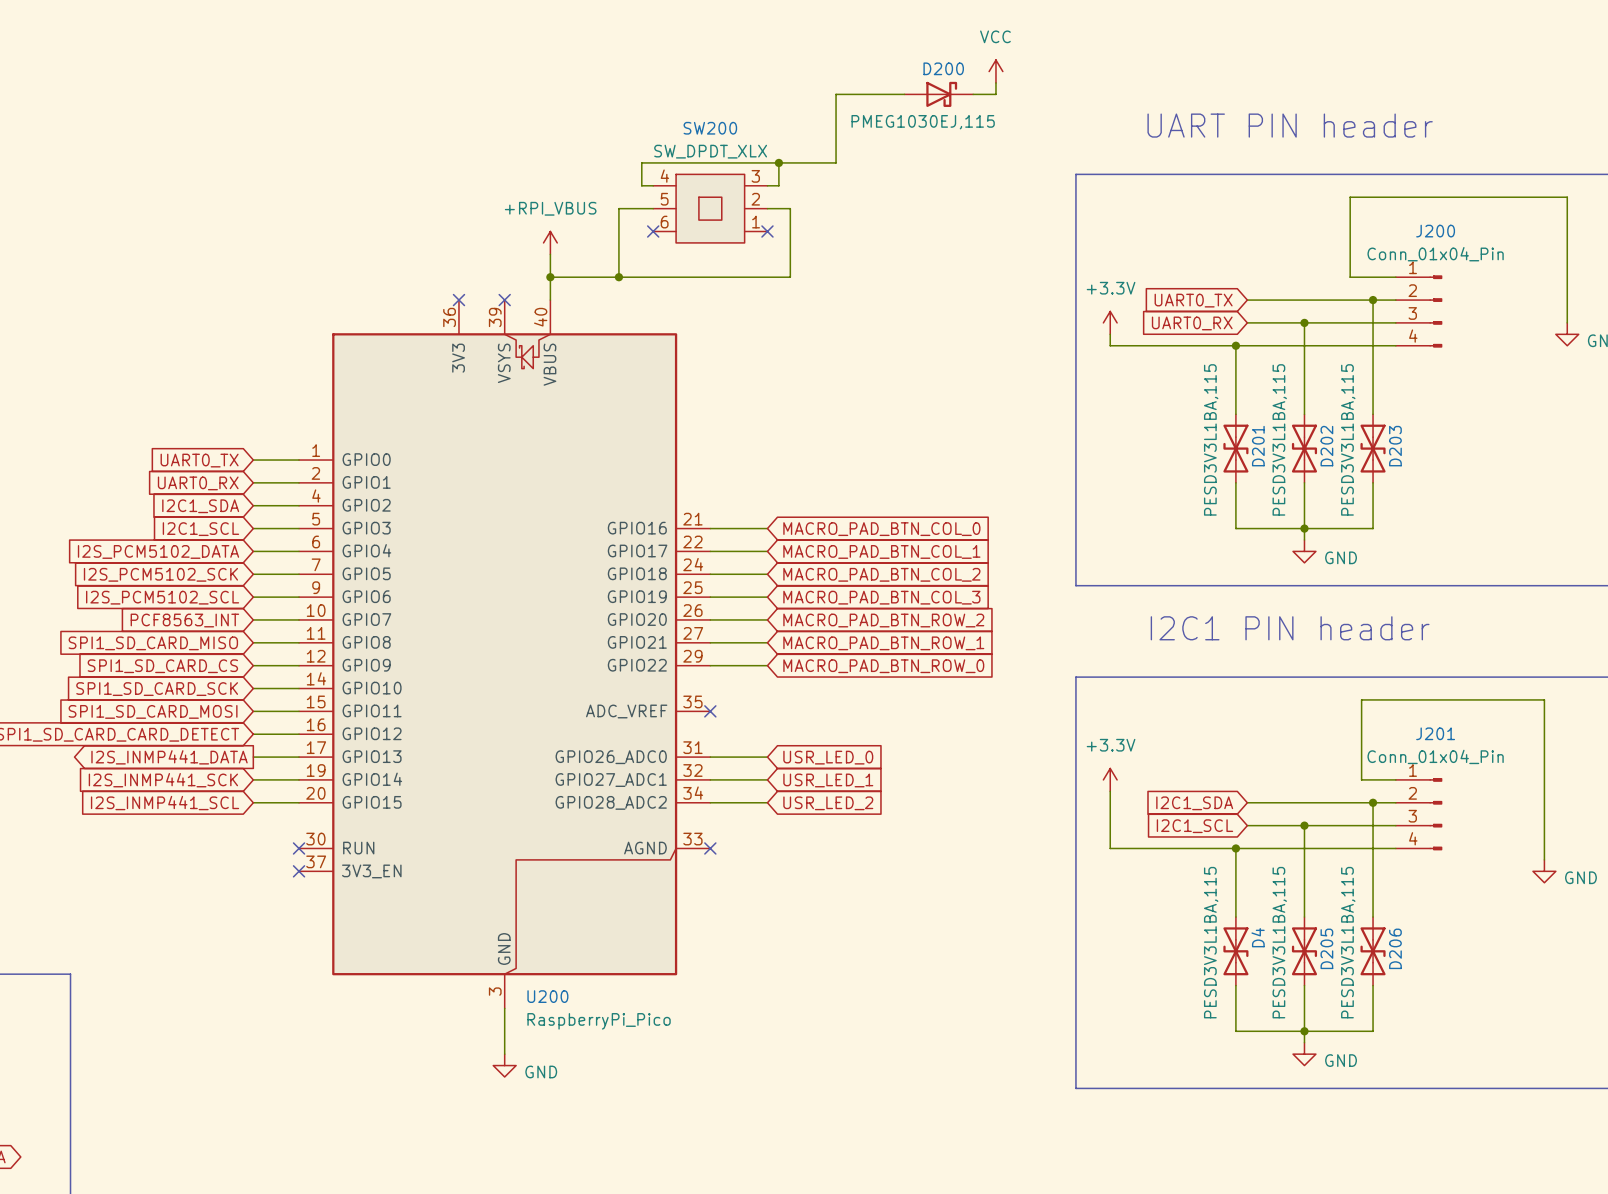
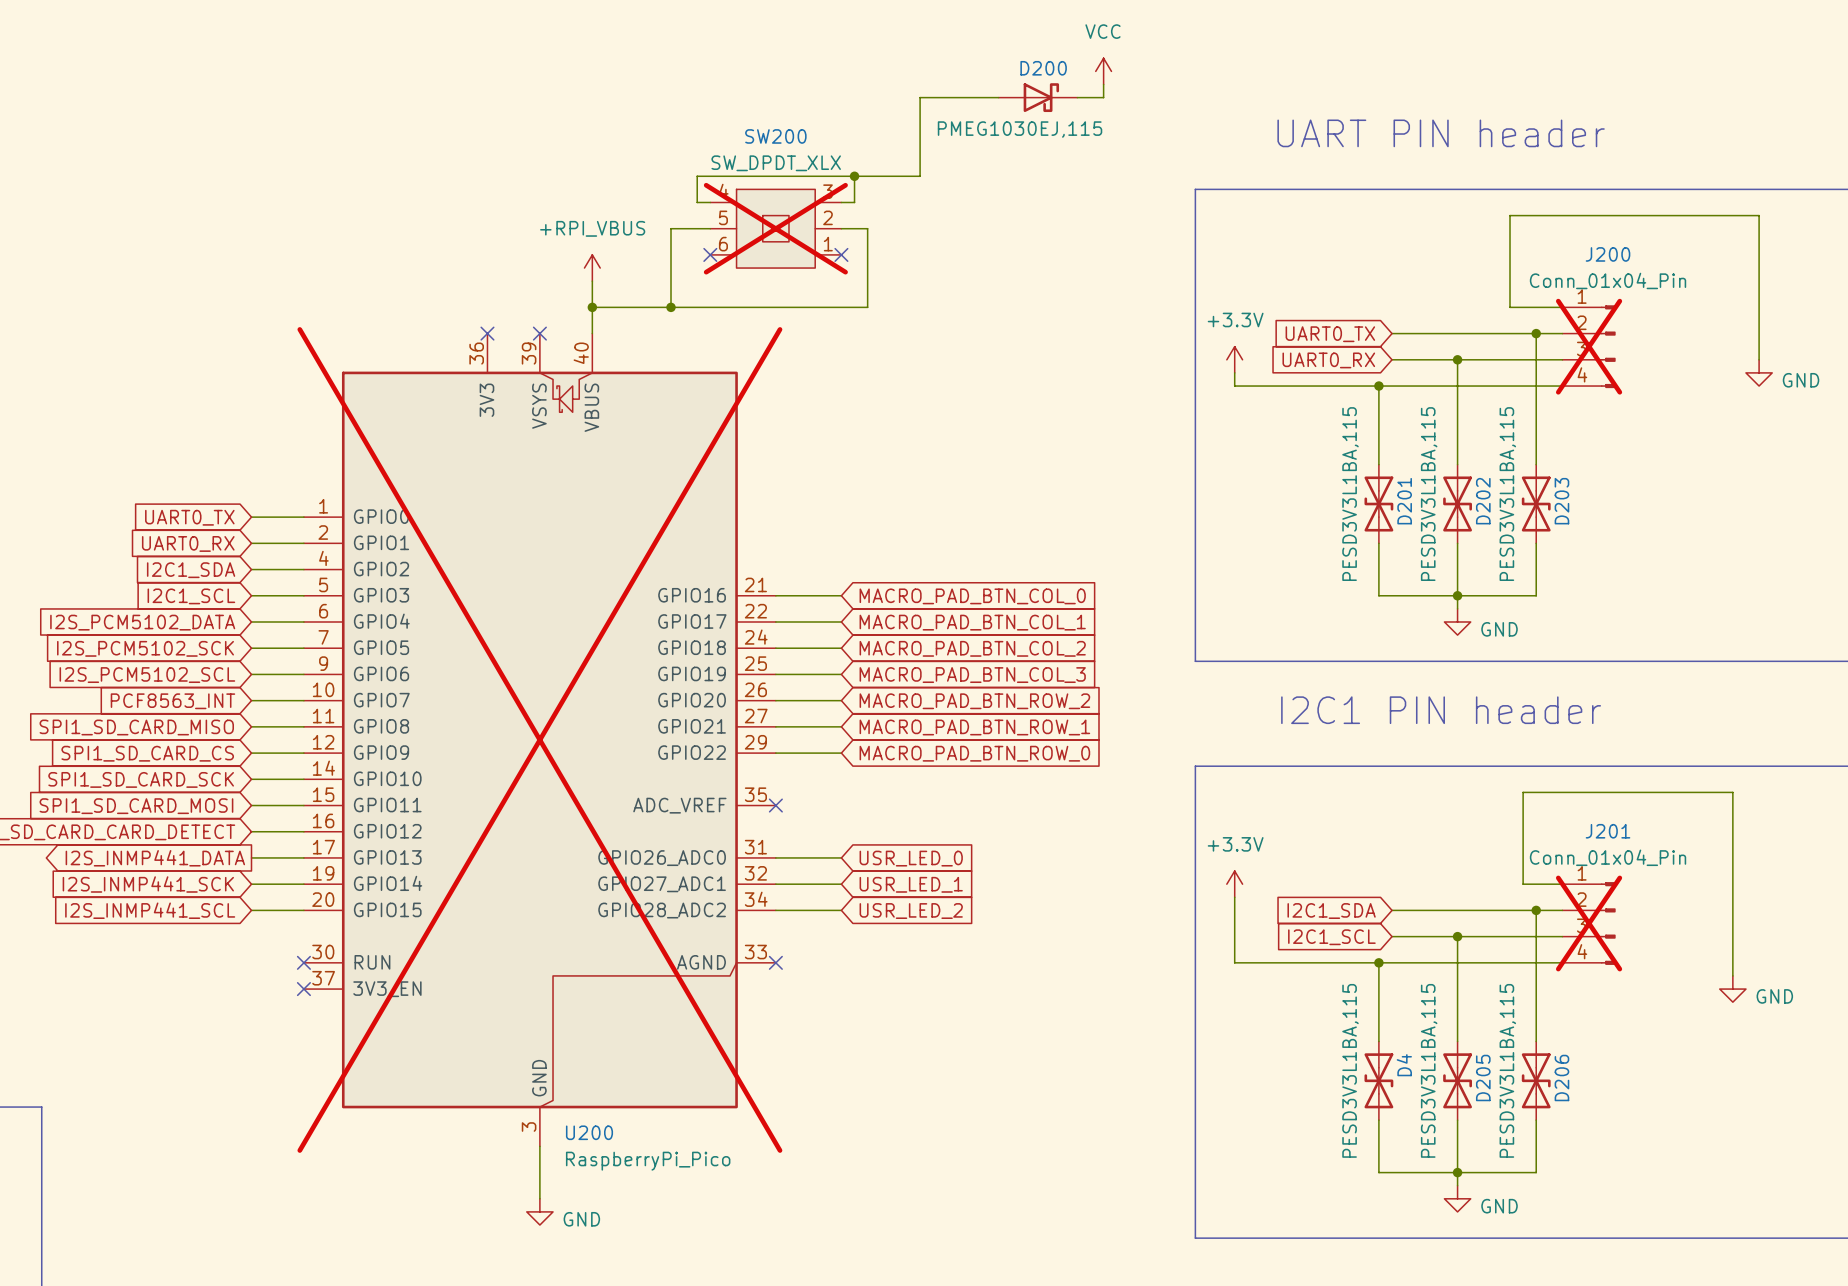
SW200 do-not-place cross: none -> (775, 228)
J200 do-not-place cross: none -> (1589, 346)
U200 do-not-place cross: none -> (539, 739)
J201 do-not-place cross: none -> (1589, 923)

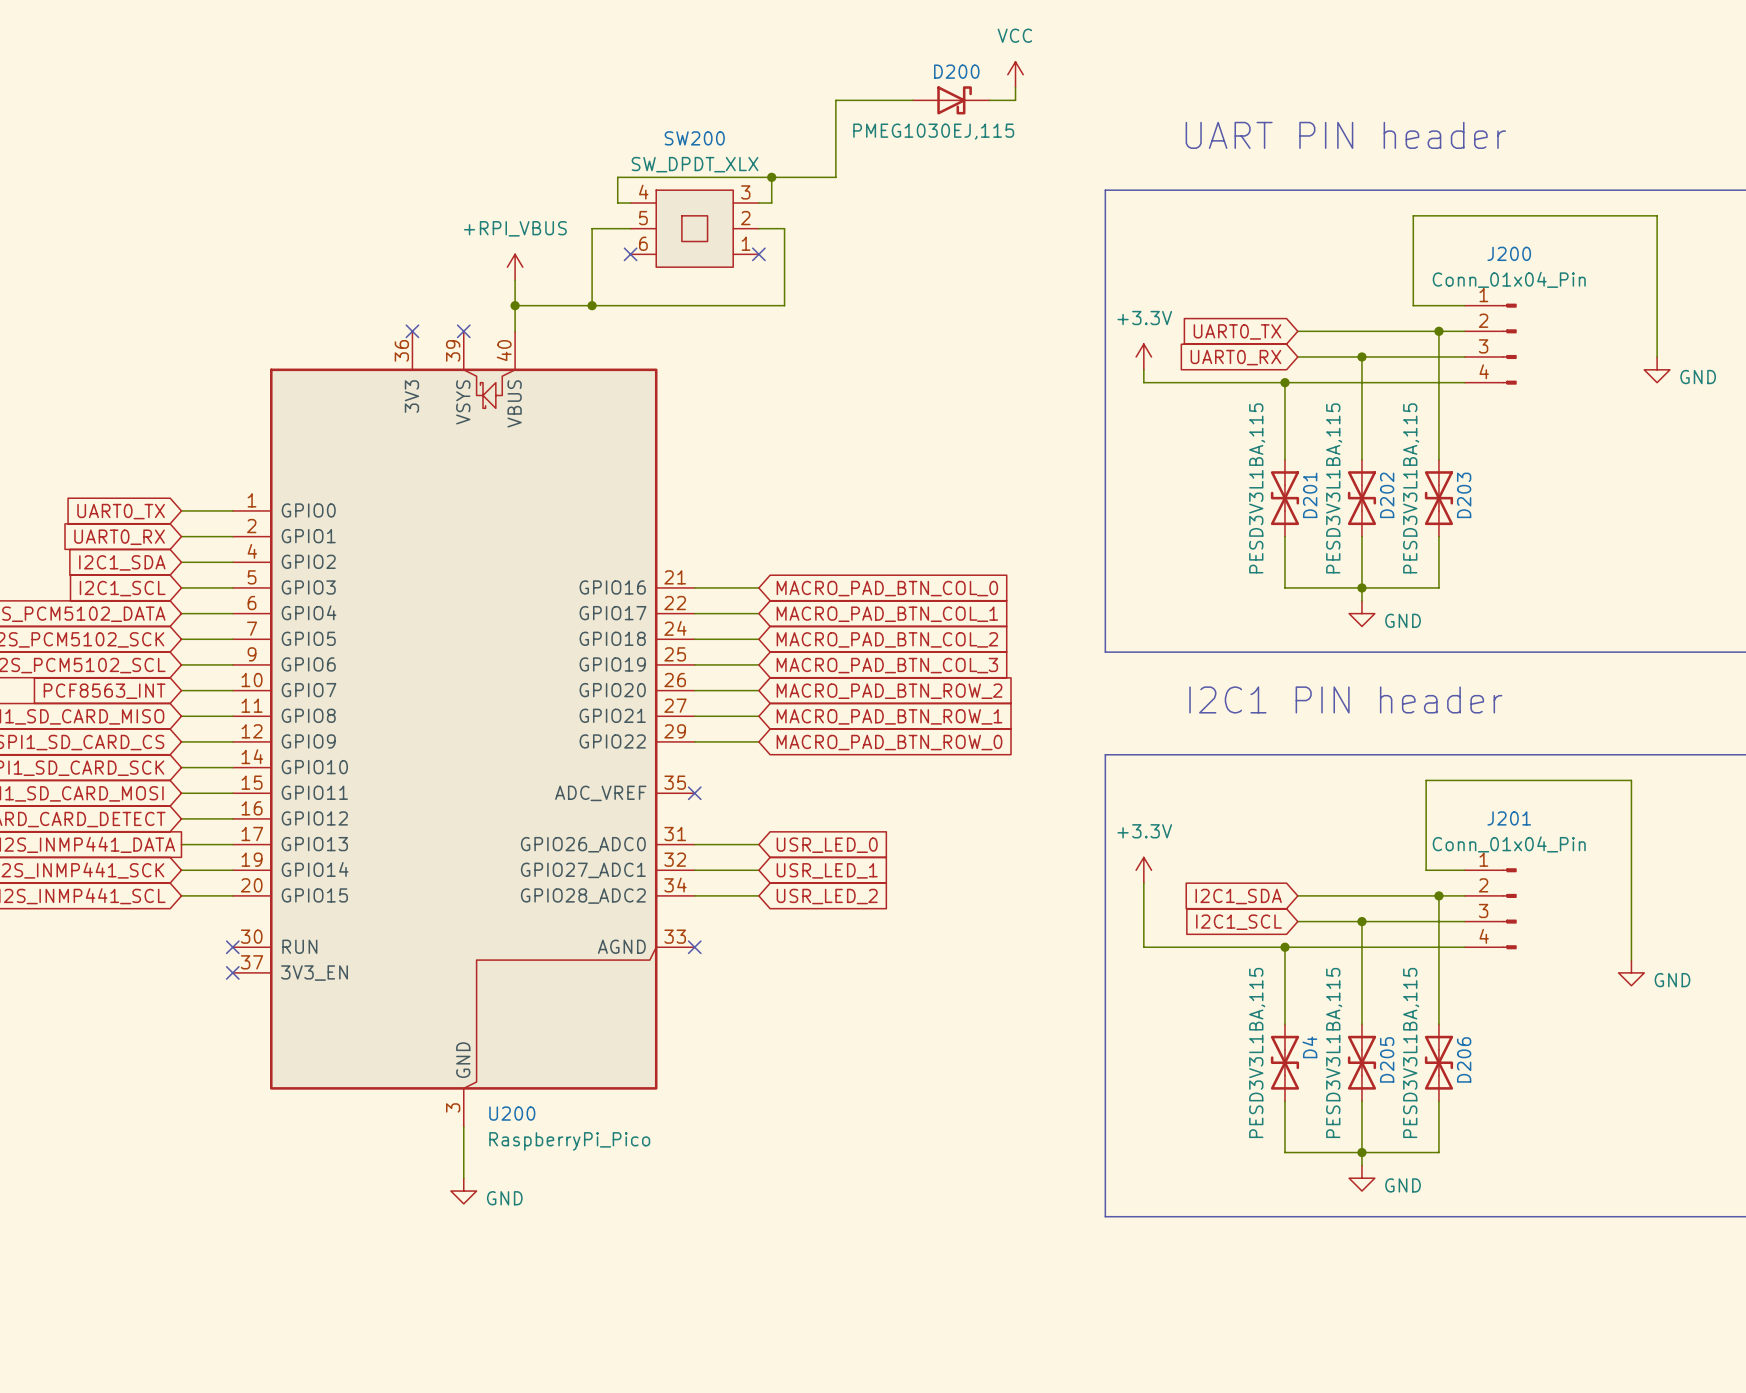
SW200 do-not-place cross: (775, 228) -> none
J200 do-not-place cross: (1589, 346) -> none
U200 do-not-place cross: (539, 739) -> none
J201 do-not-place cross: (1589, 923) -> none

